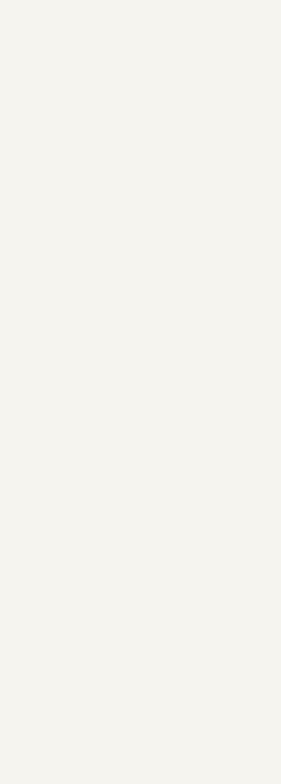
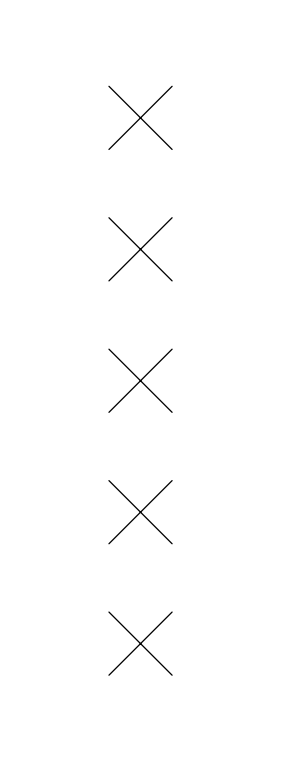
no-connect mark: none -> (140, 117)
no-connect mark: none -> (140, 249)
no-connect mark: none -> (140, 380)
no-connect mark: none -> (140, 512)
no-connect mark: none -> (140, 643)

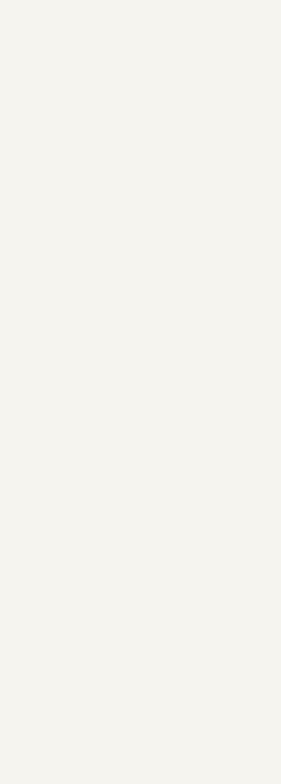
no-connect mark: (140, 117) -> none
no-connect mark: (140, 249) -> none
no-connect mark: (140, 380) -> none
no-connect mark: (140, 512) -> none
no-connect mark: (140, 643) -> none

